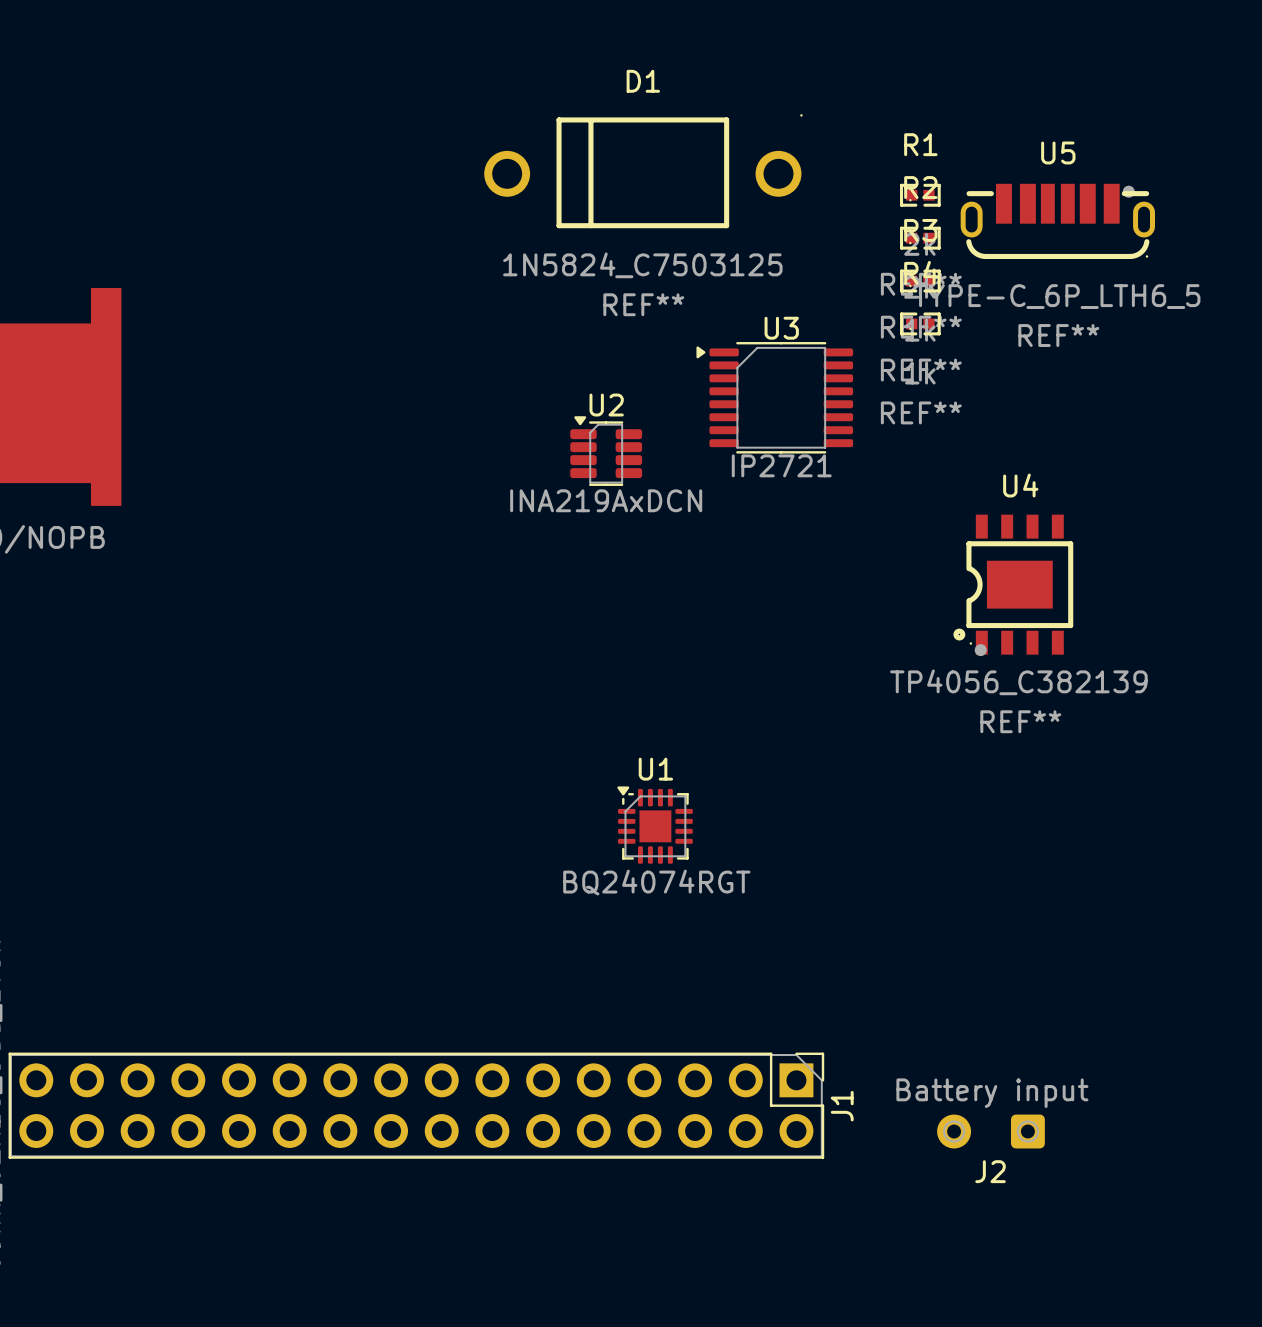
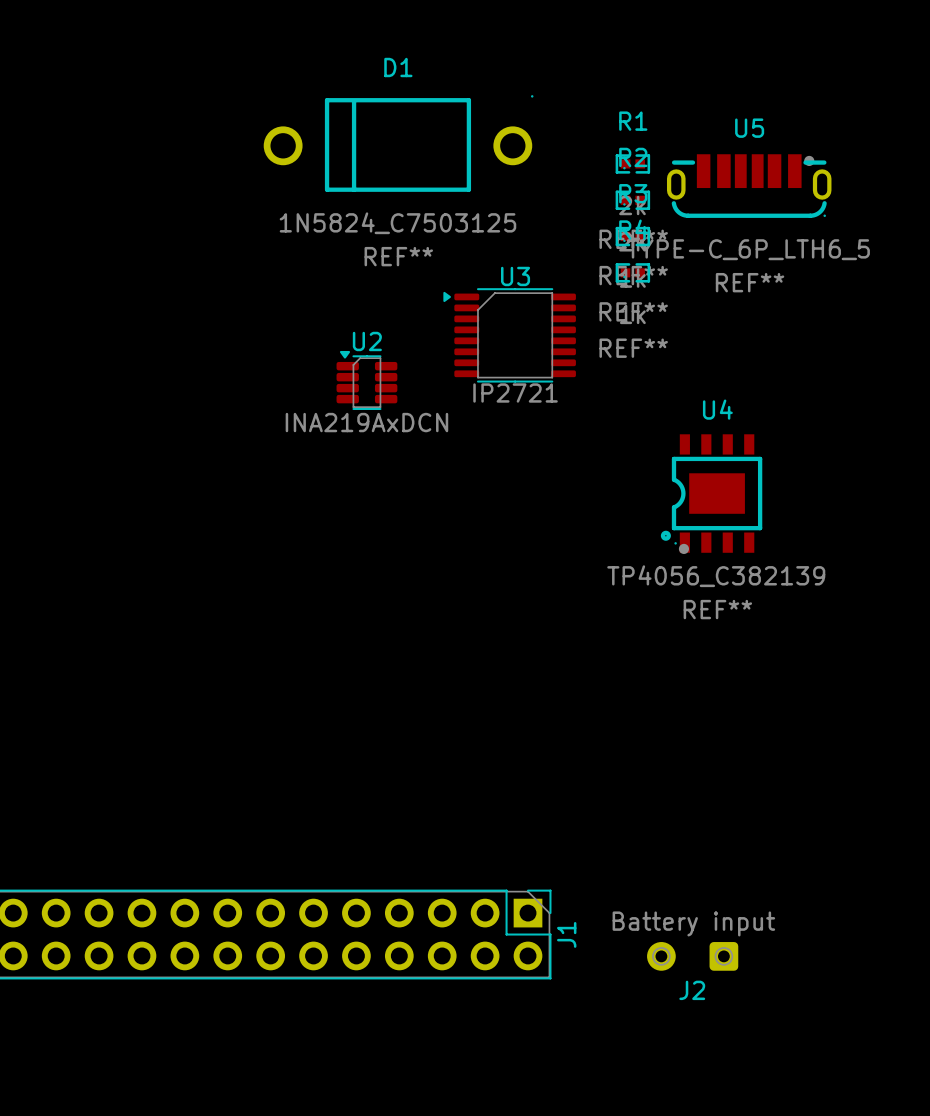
U1: BQ24074RGT (655, 825) -> none

